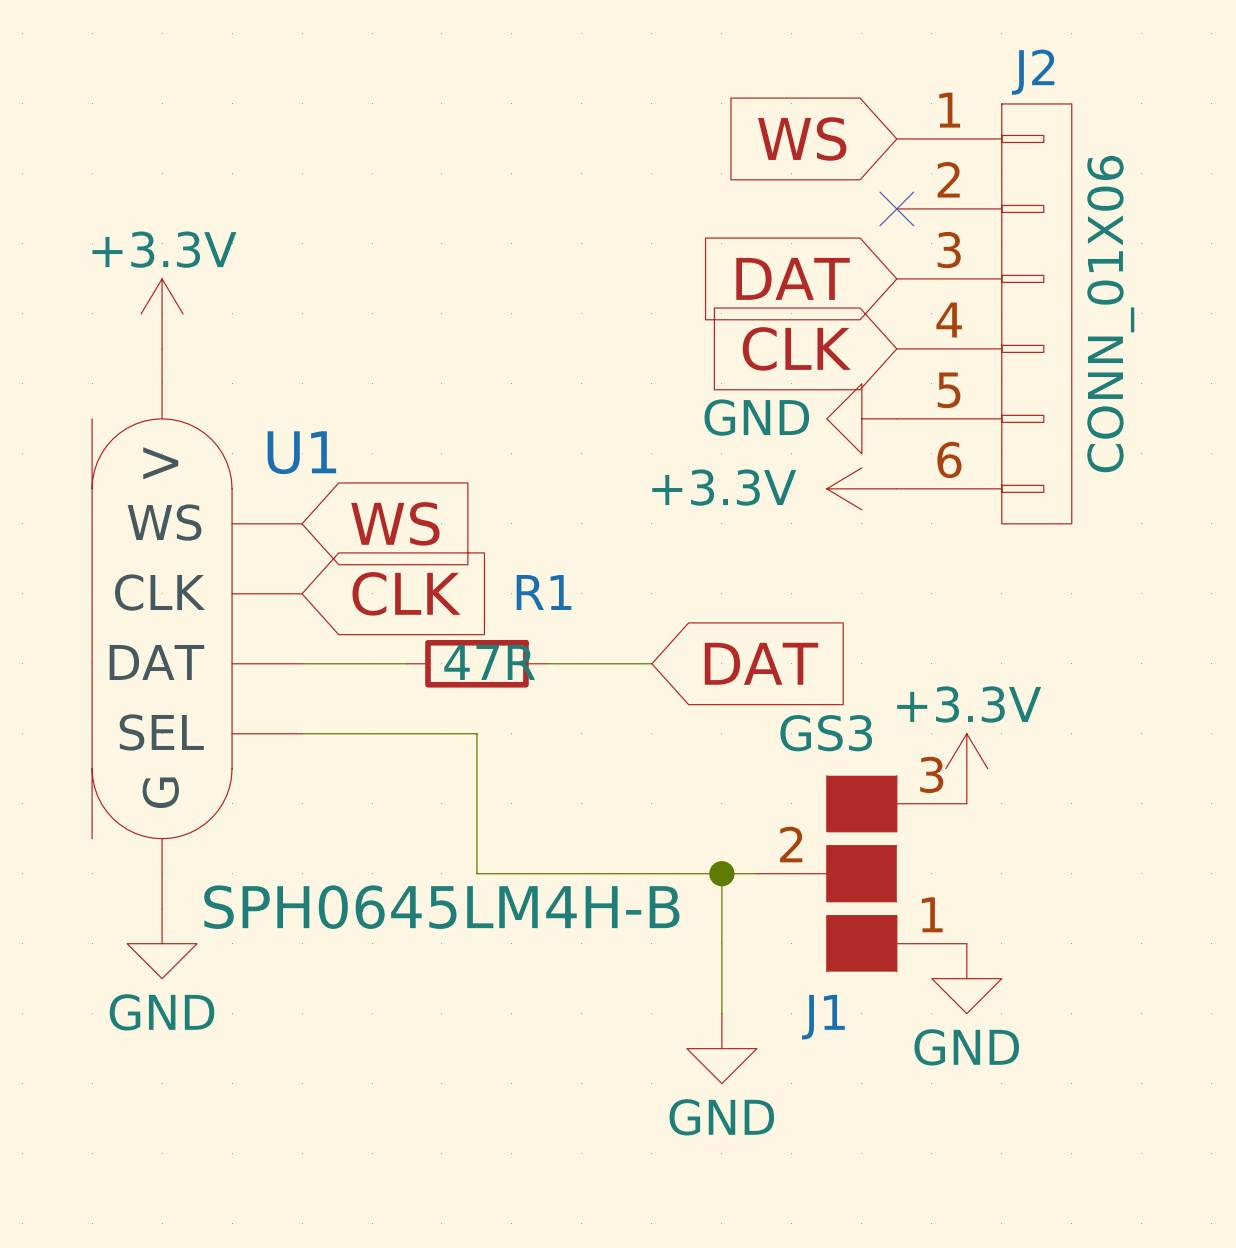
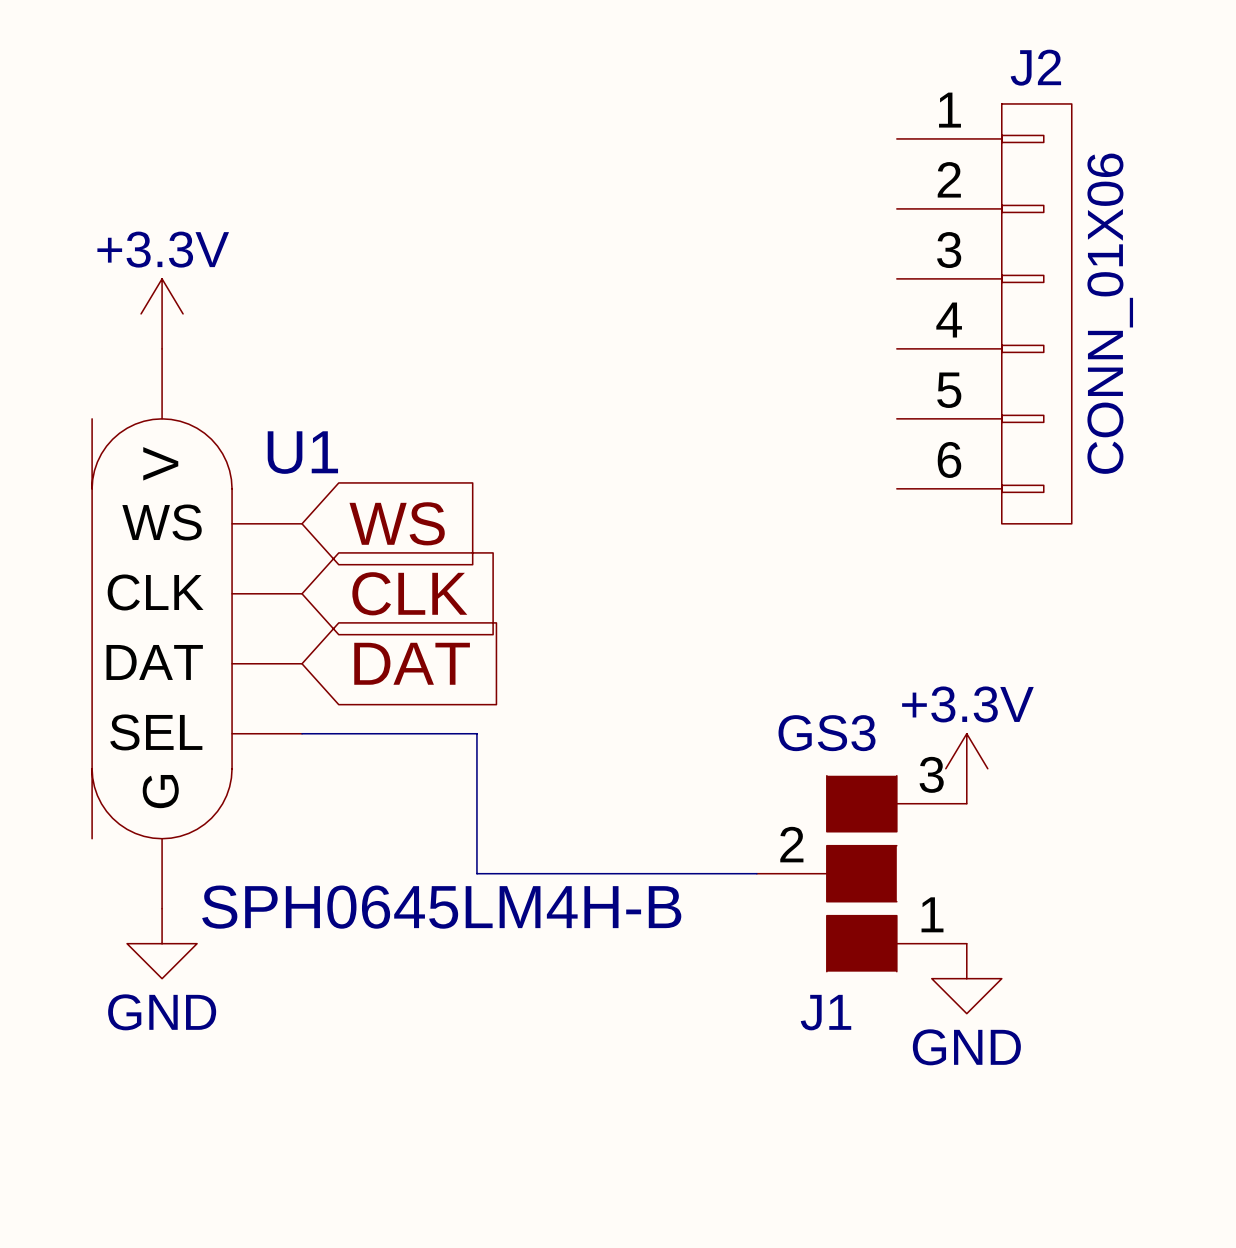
global label: WS (802, 138) -> none
no-connect mark: (896, 208) -> none
global label: DAT (793, 278) -> none
global label: CLK (796, 348) -> none
power symbol: GND (861, 418) -> none
power symbol: +3.3V (861, 488) -> none
wire: (302, 663) (406, 663) -> none
R1: 47R (476, 663) -> none
wire: (546, 663) (651, 663) -> none
global label position: DAT (761, 663) -> DAT (412, 663)
wire: (721, 873) (721, 1013) -> none
junction: (721, 873) -> none
power symbol: GND (721, 1048) -> none

